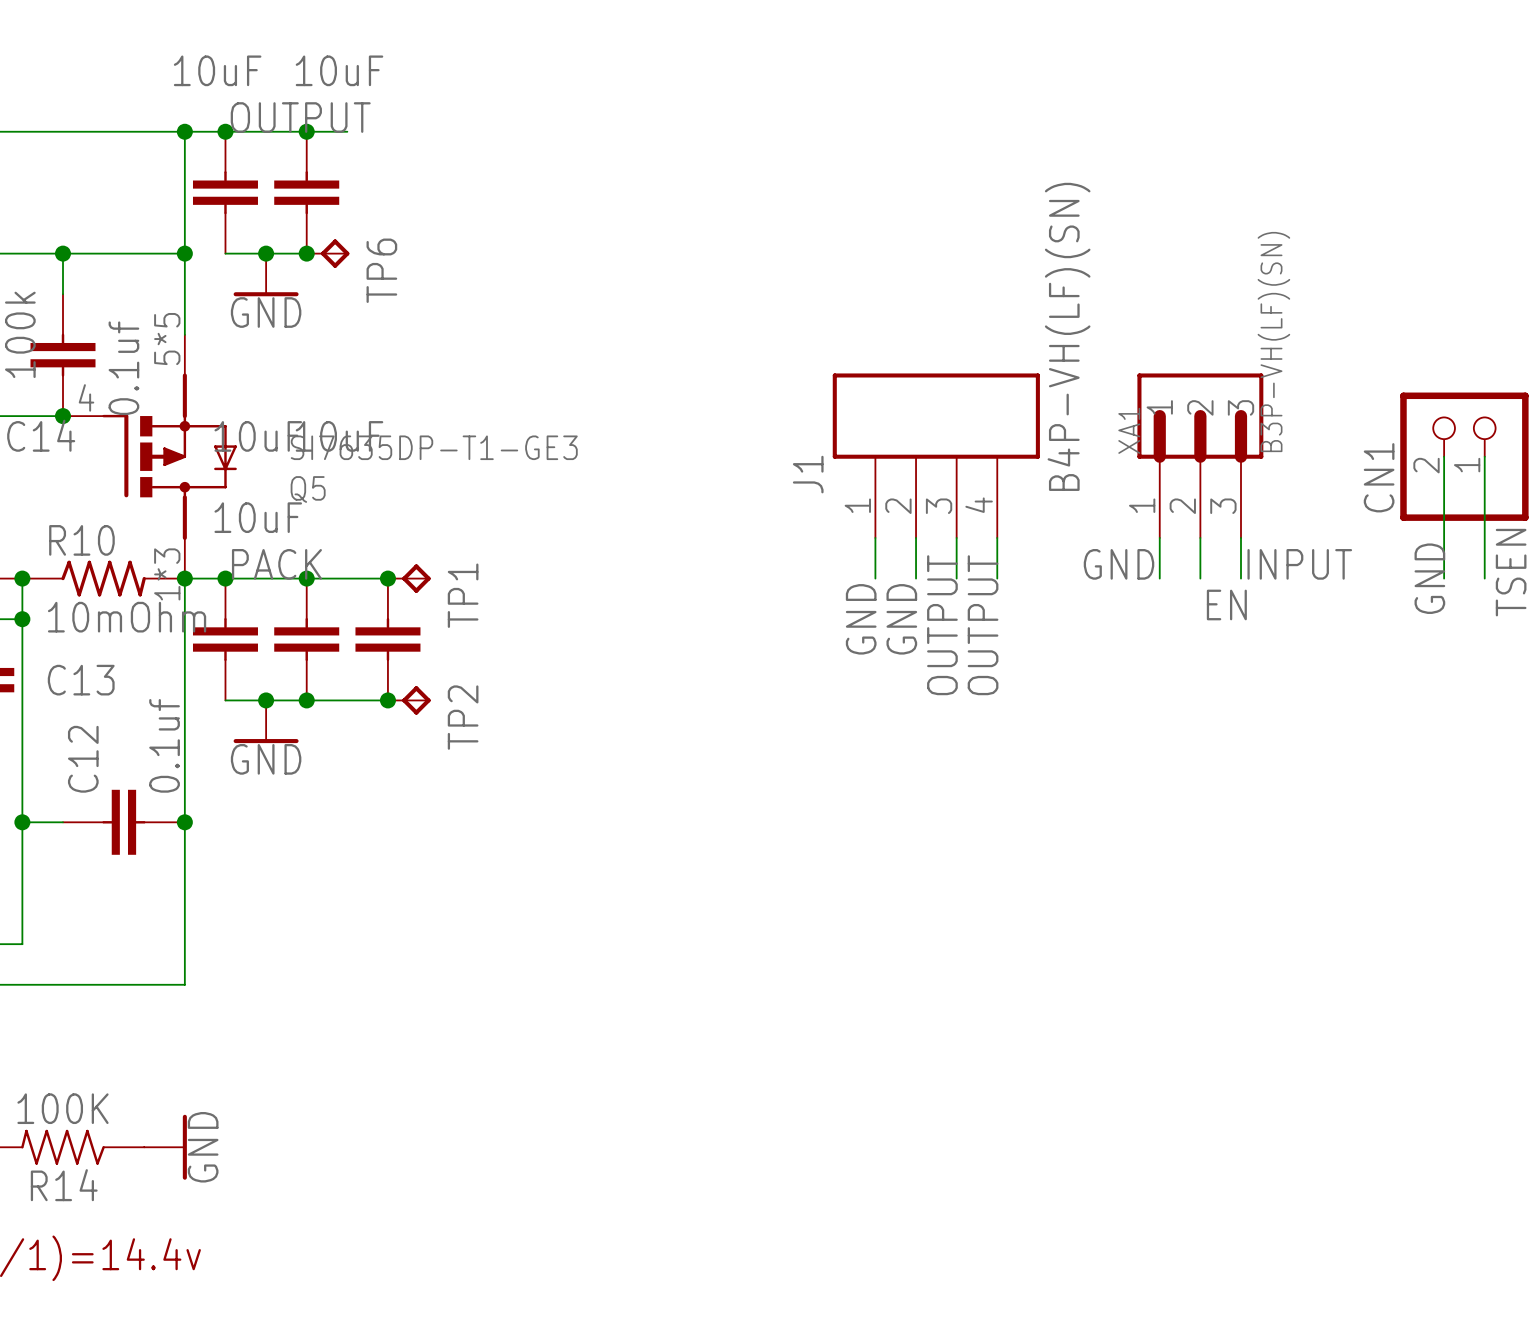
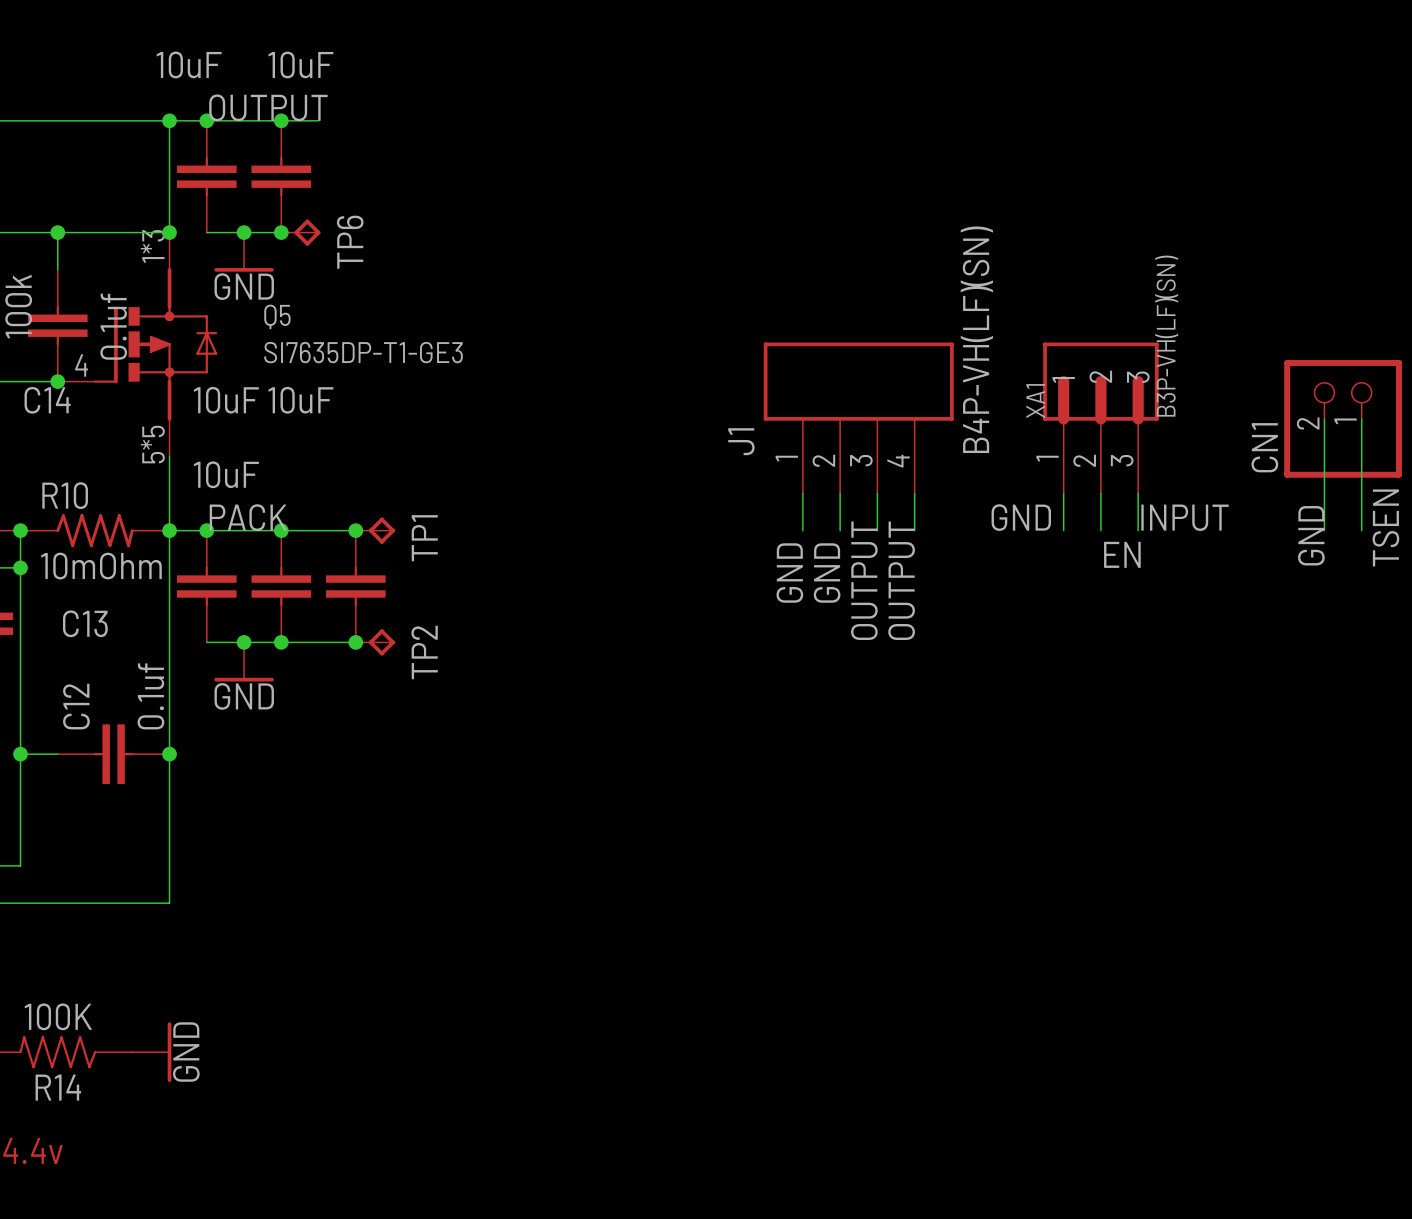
Q5 flip: as is (169, 456) -> up-down (155, 344)

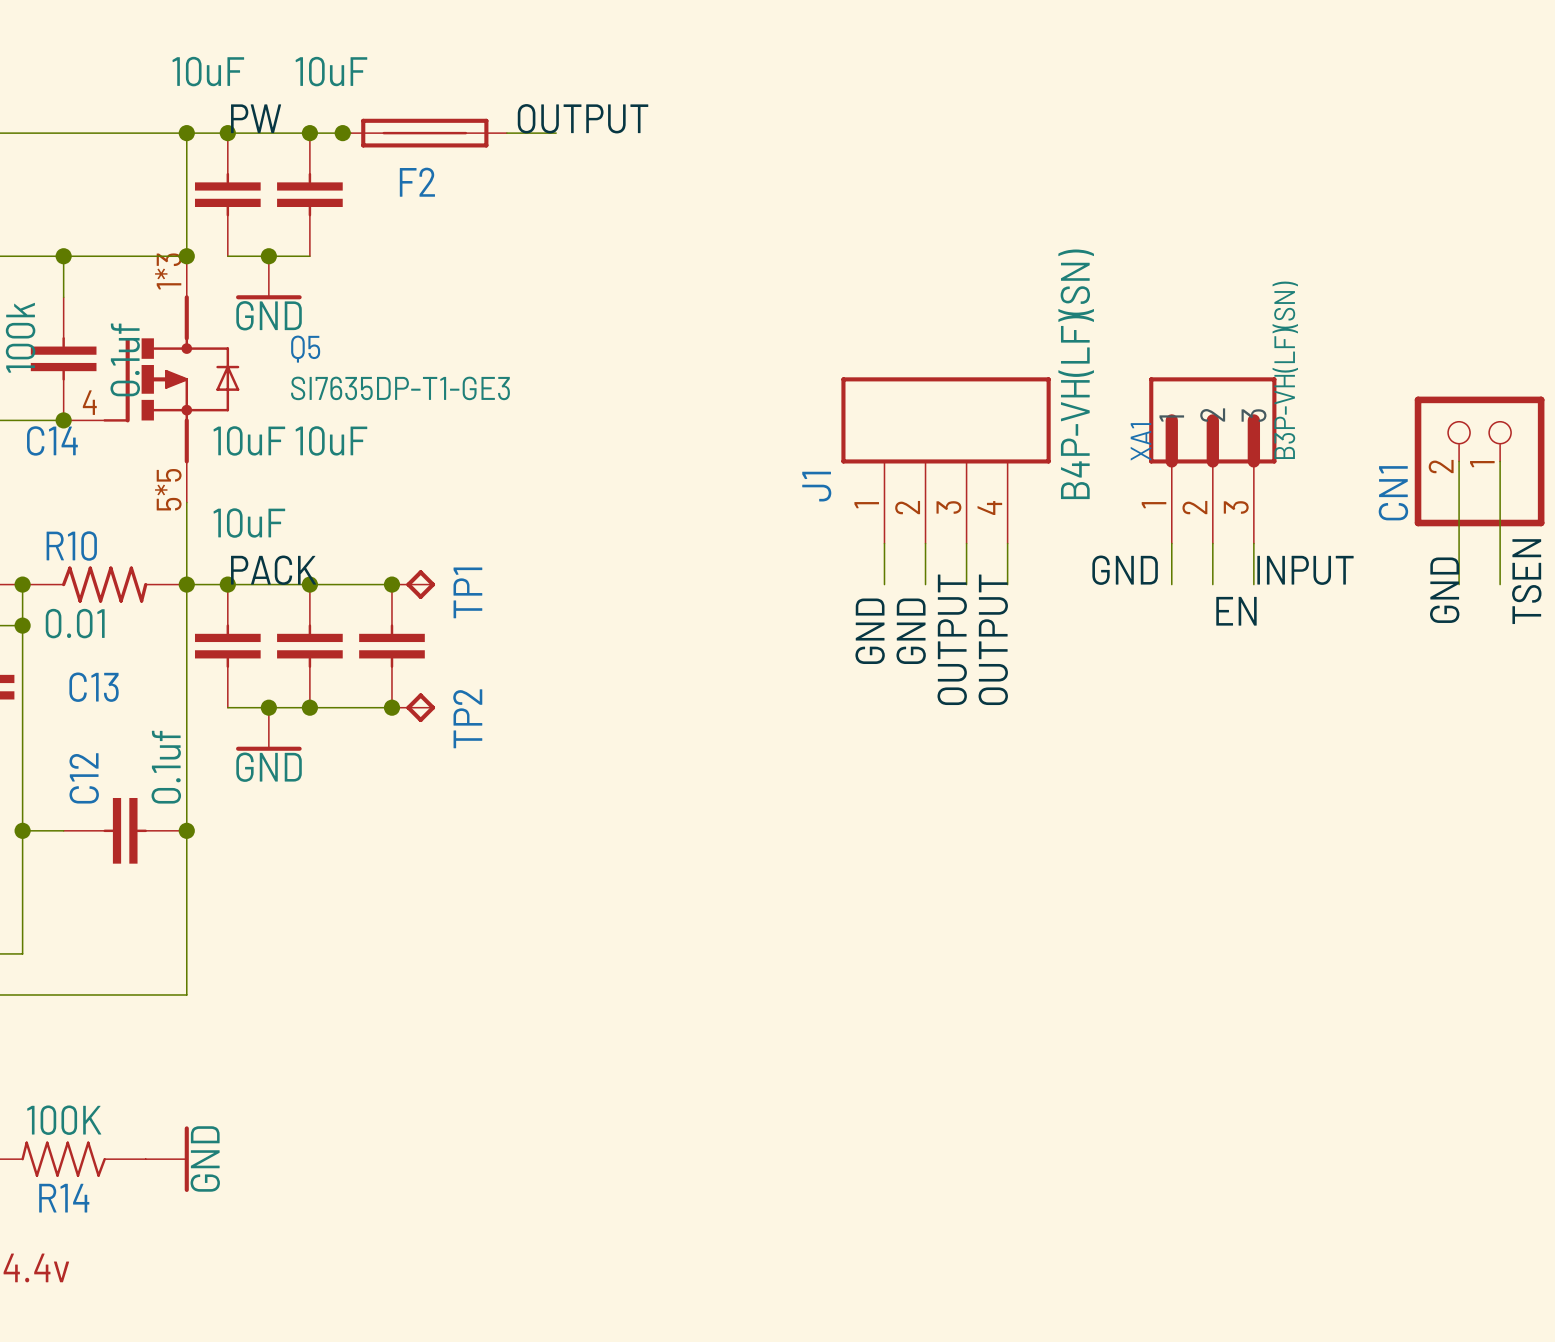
label: OUTPUT (268, 107) -> PW (256, 118)
label: none -> OUTPUT (583, 118)
junction: none -> (342, 133)
F2: none -> (424, 133)
wire: none -> (506, 133) (556, 133)
junction: (281, 232) -> none
TP6: (300, 232) -> none
R10 value: 10mOhm (101, 566) -> 0.01 (75, 623)

